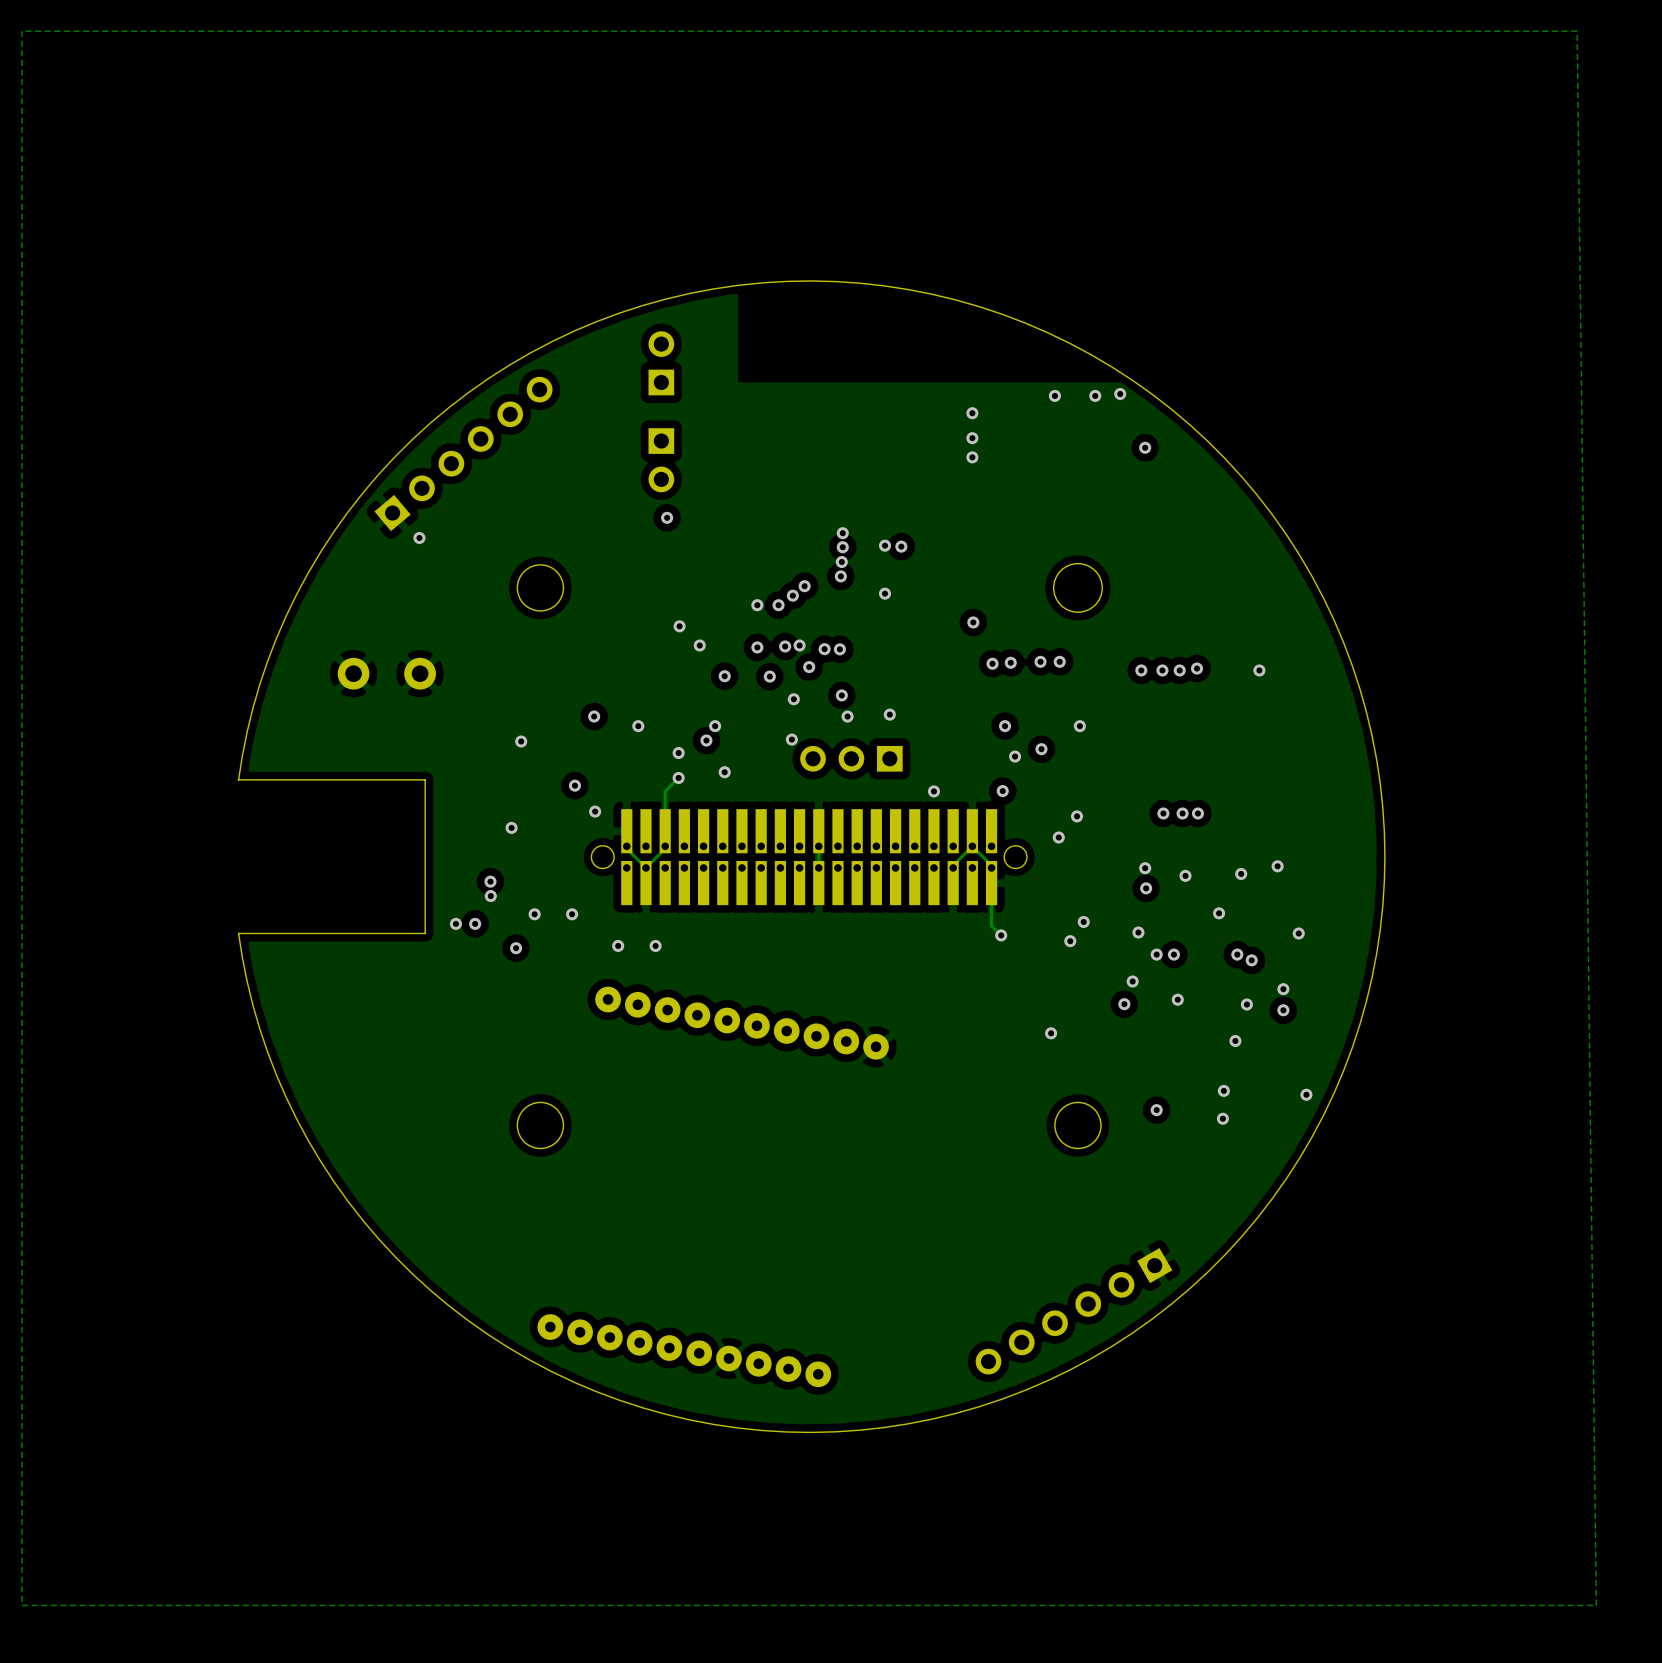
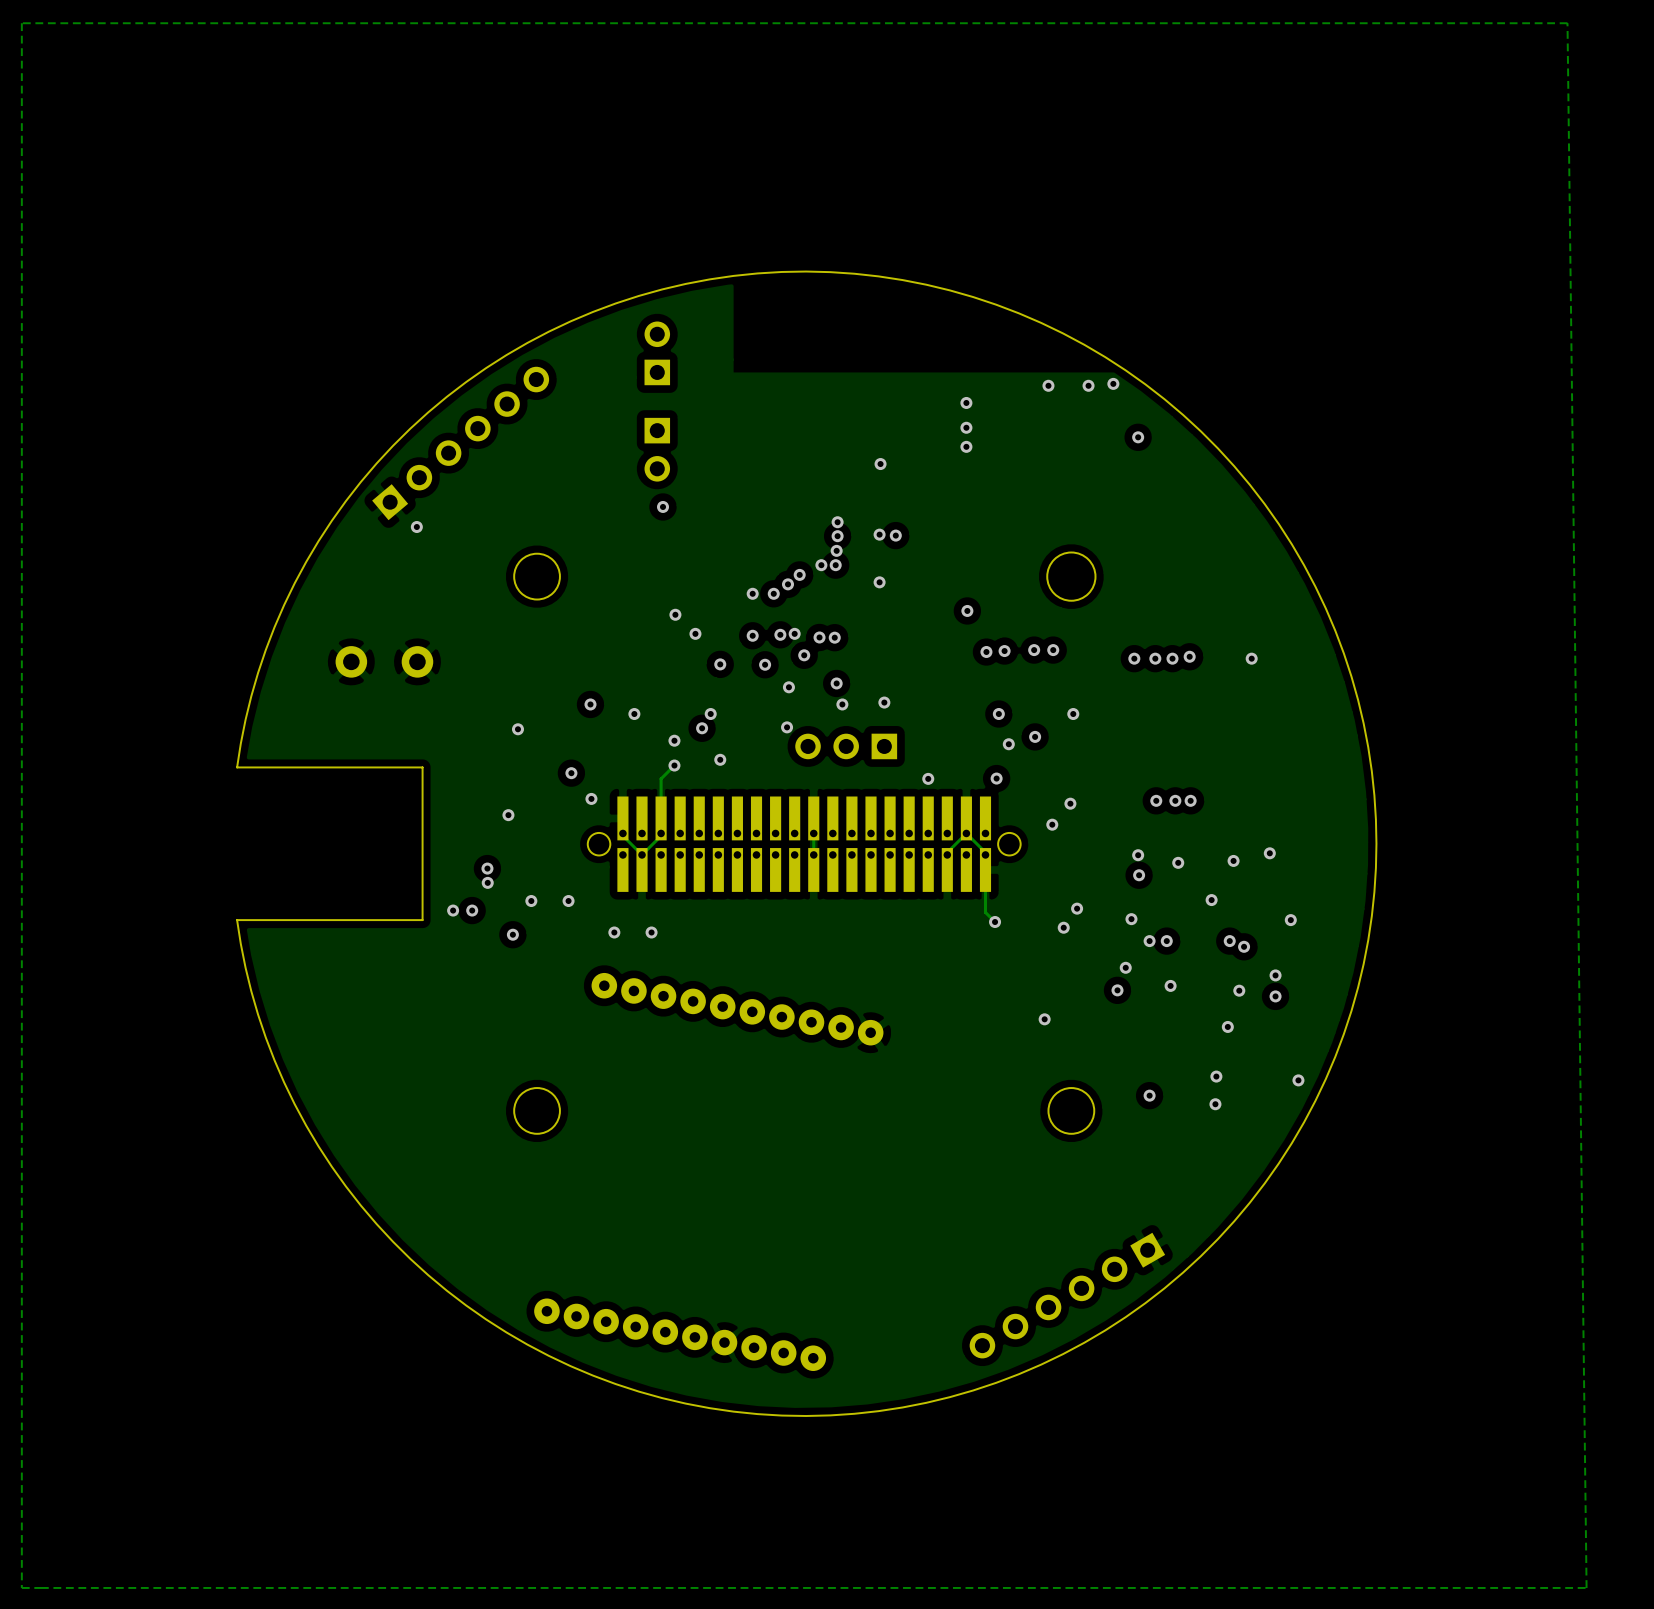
via: none -> (880, 464)
via: none -> (821, 565)

